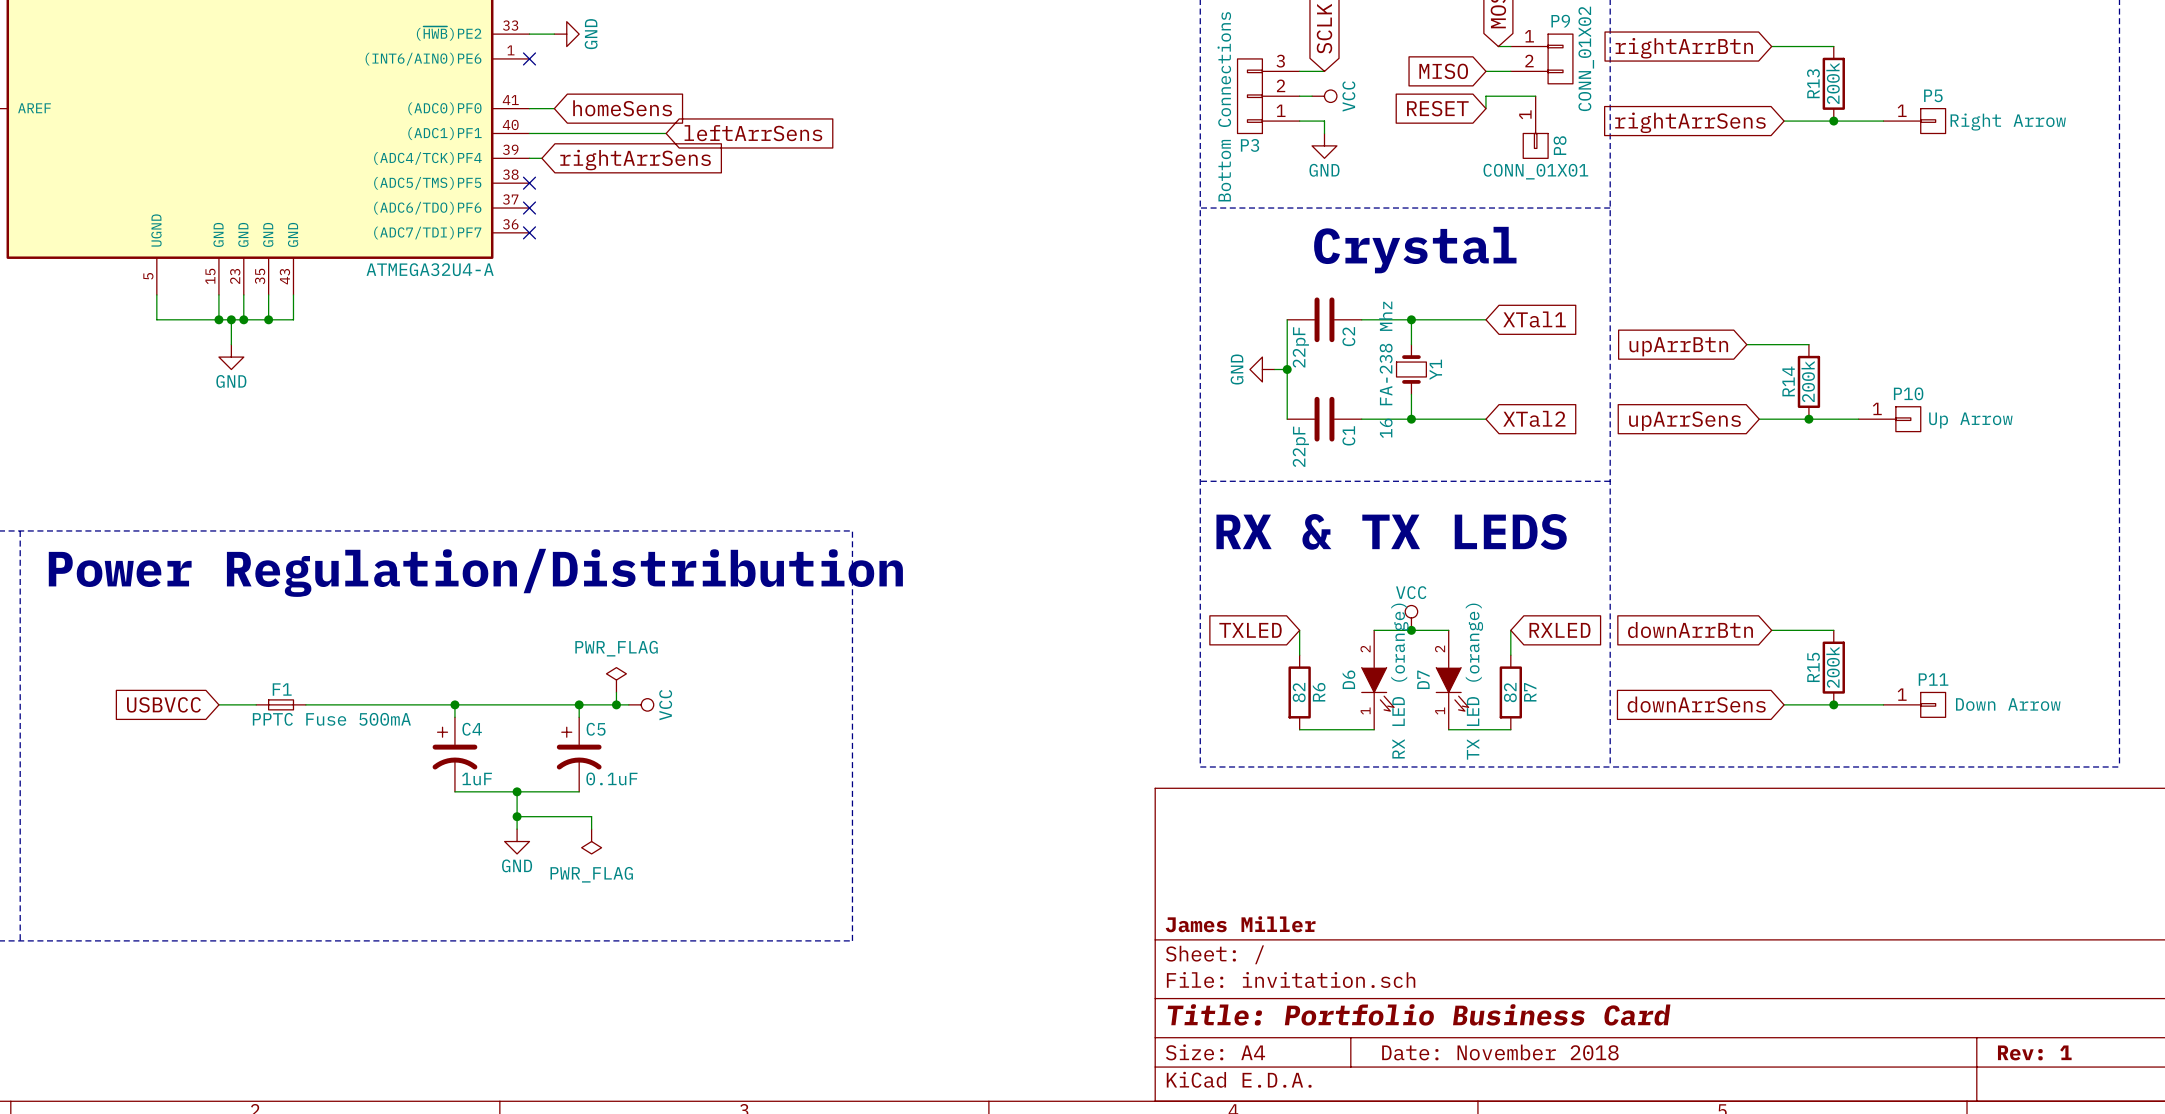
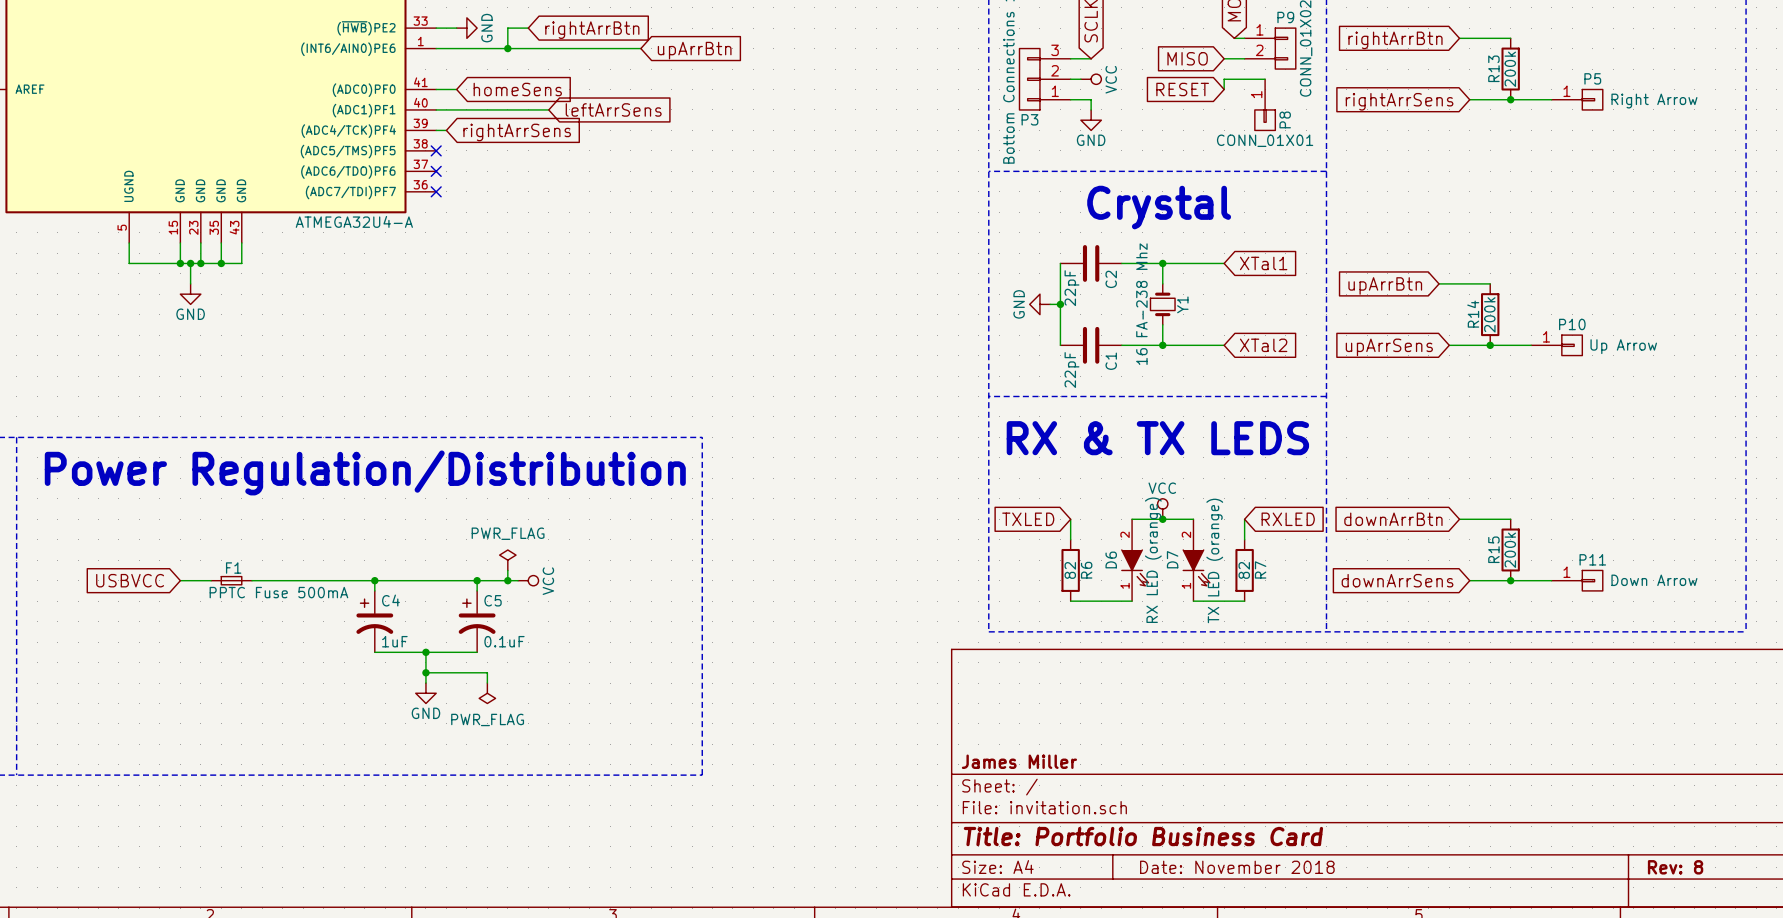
wire: none -> (528, 28) (507, 28) (507, 48)
global label: none -> rightArrBtn (592, 30)
wire: none -> (436, 48) (640, 48)
no-connect mark: (529, 58) -> none
junction: none -> (507, 48)
global label: none -> upArrBtn (694, 50)
title block: Rev: 1 (2034, 1052) -> Rev: 8 (1675, 867)

